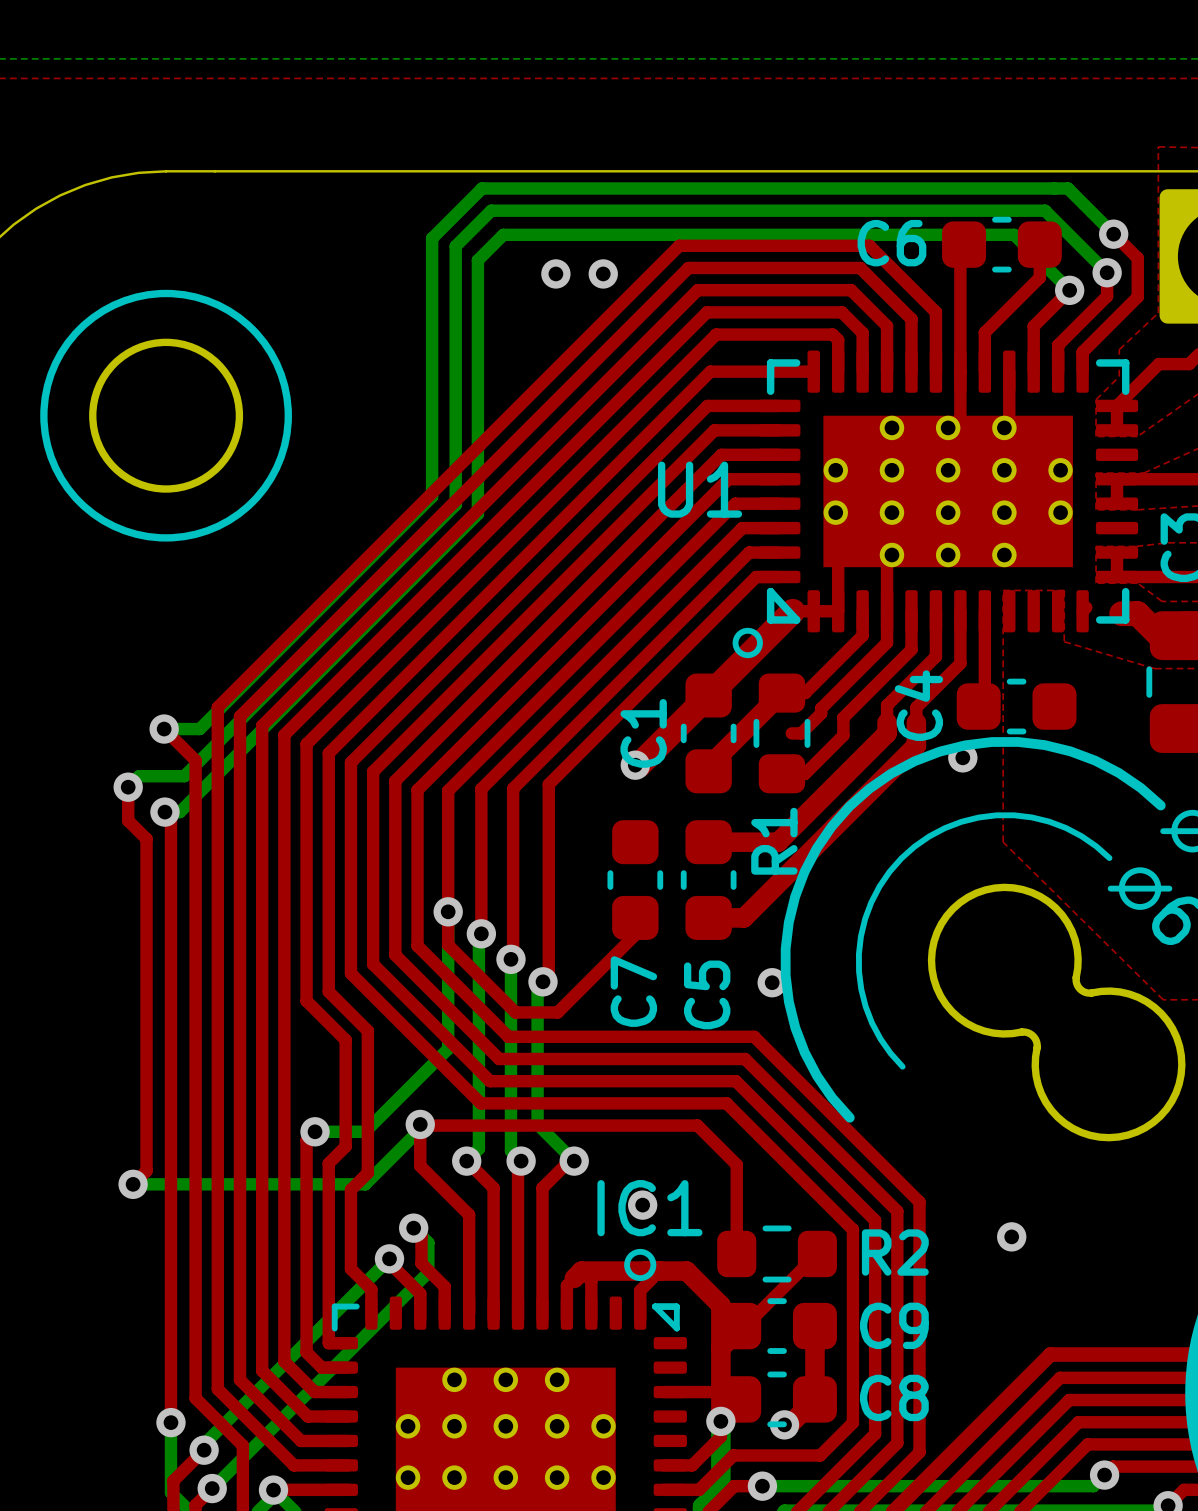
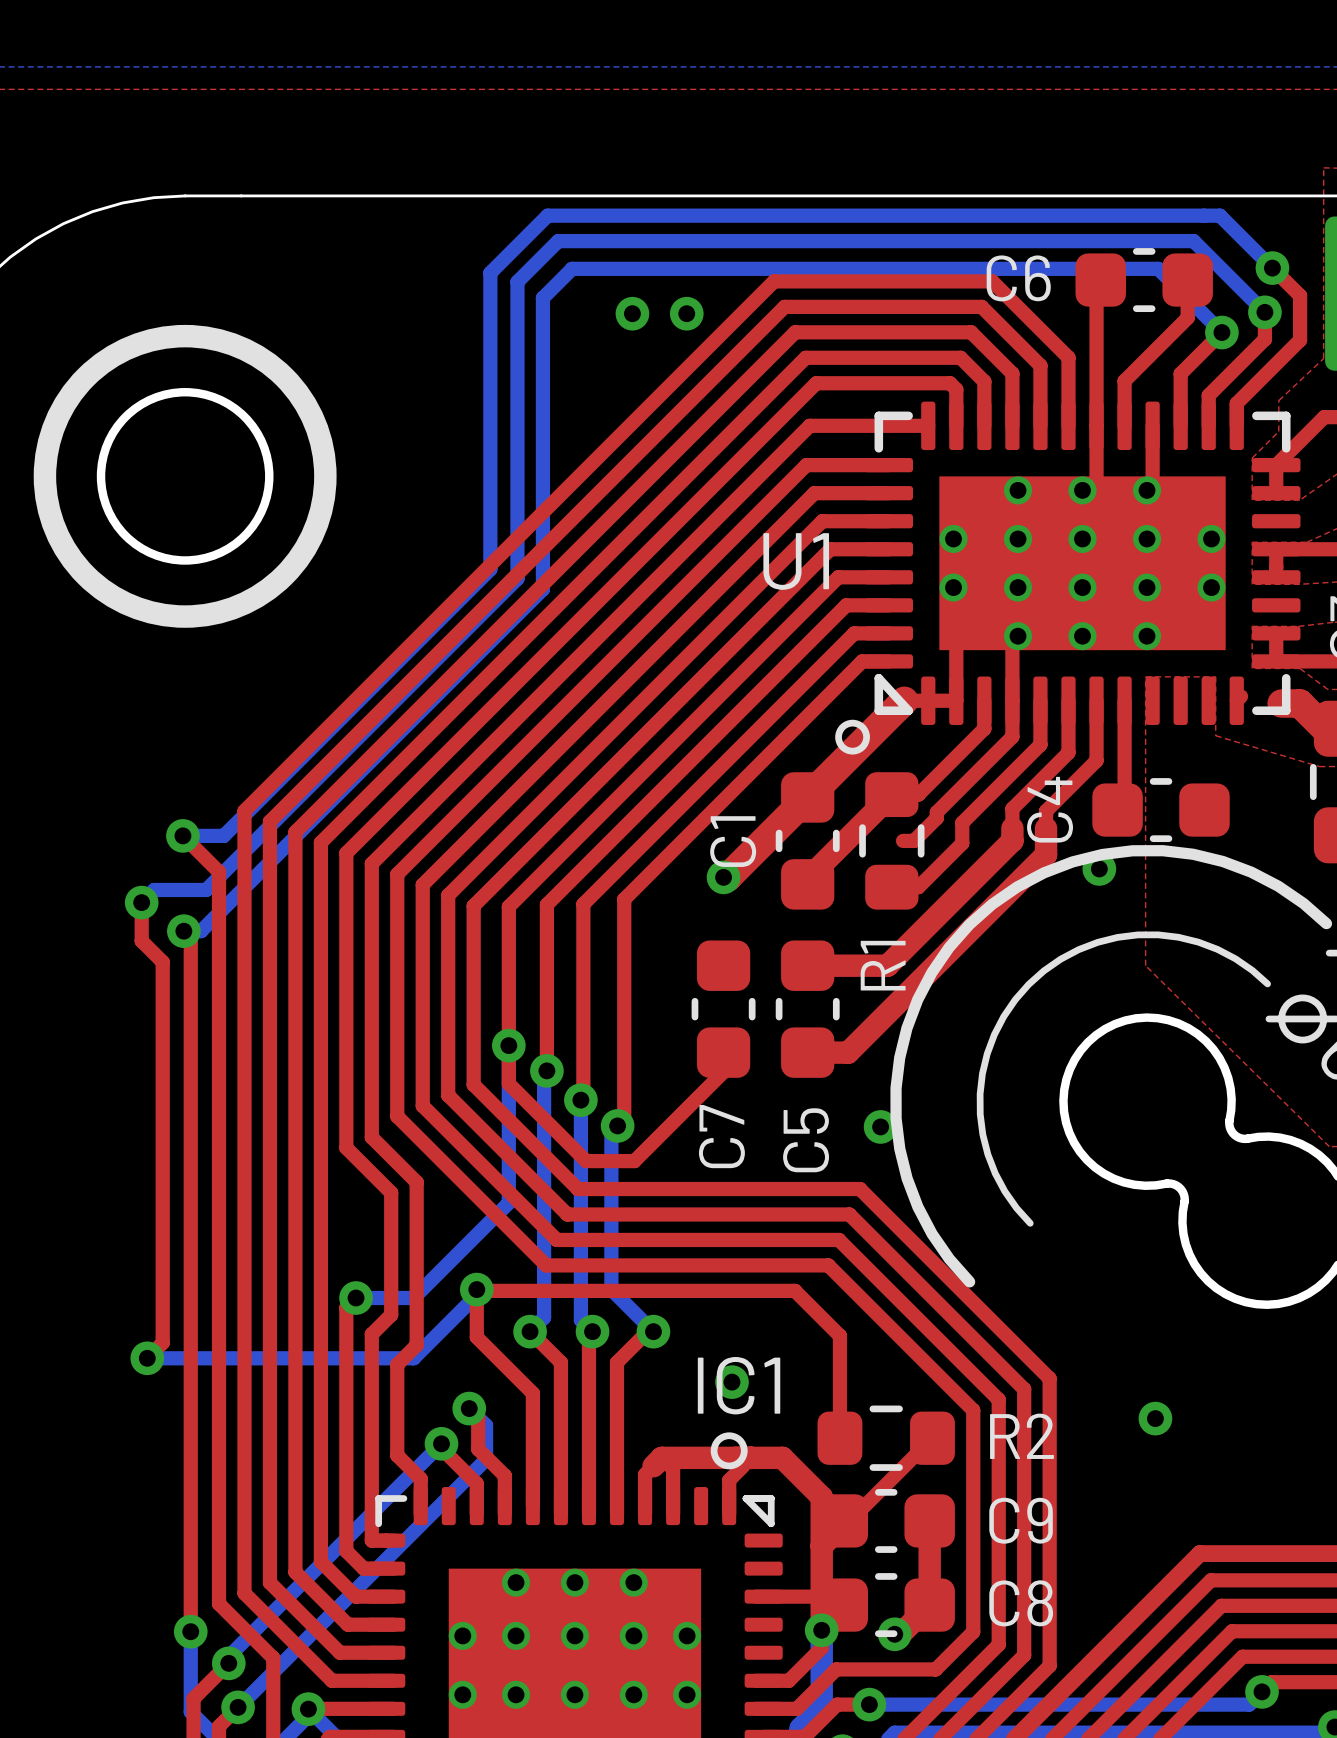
drawing shape: [40, 289, 292, 542] -> [33, 324, 337, 628]

